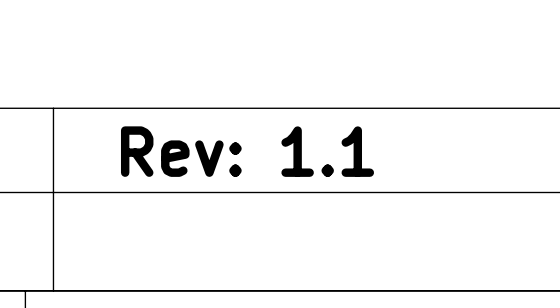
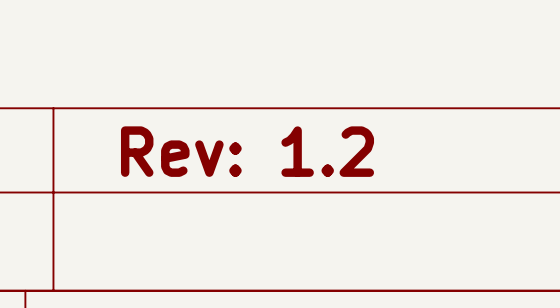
title block: Rev: 1.1 (247, 151) -> Rev: 1.2 (247, 151)

